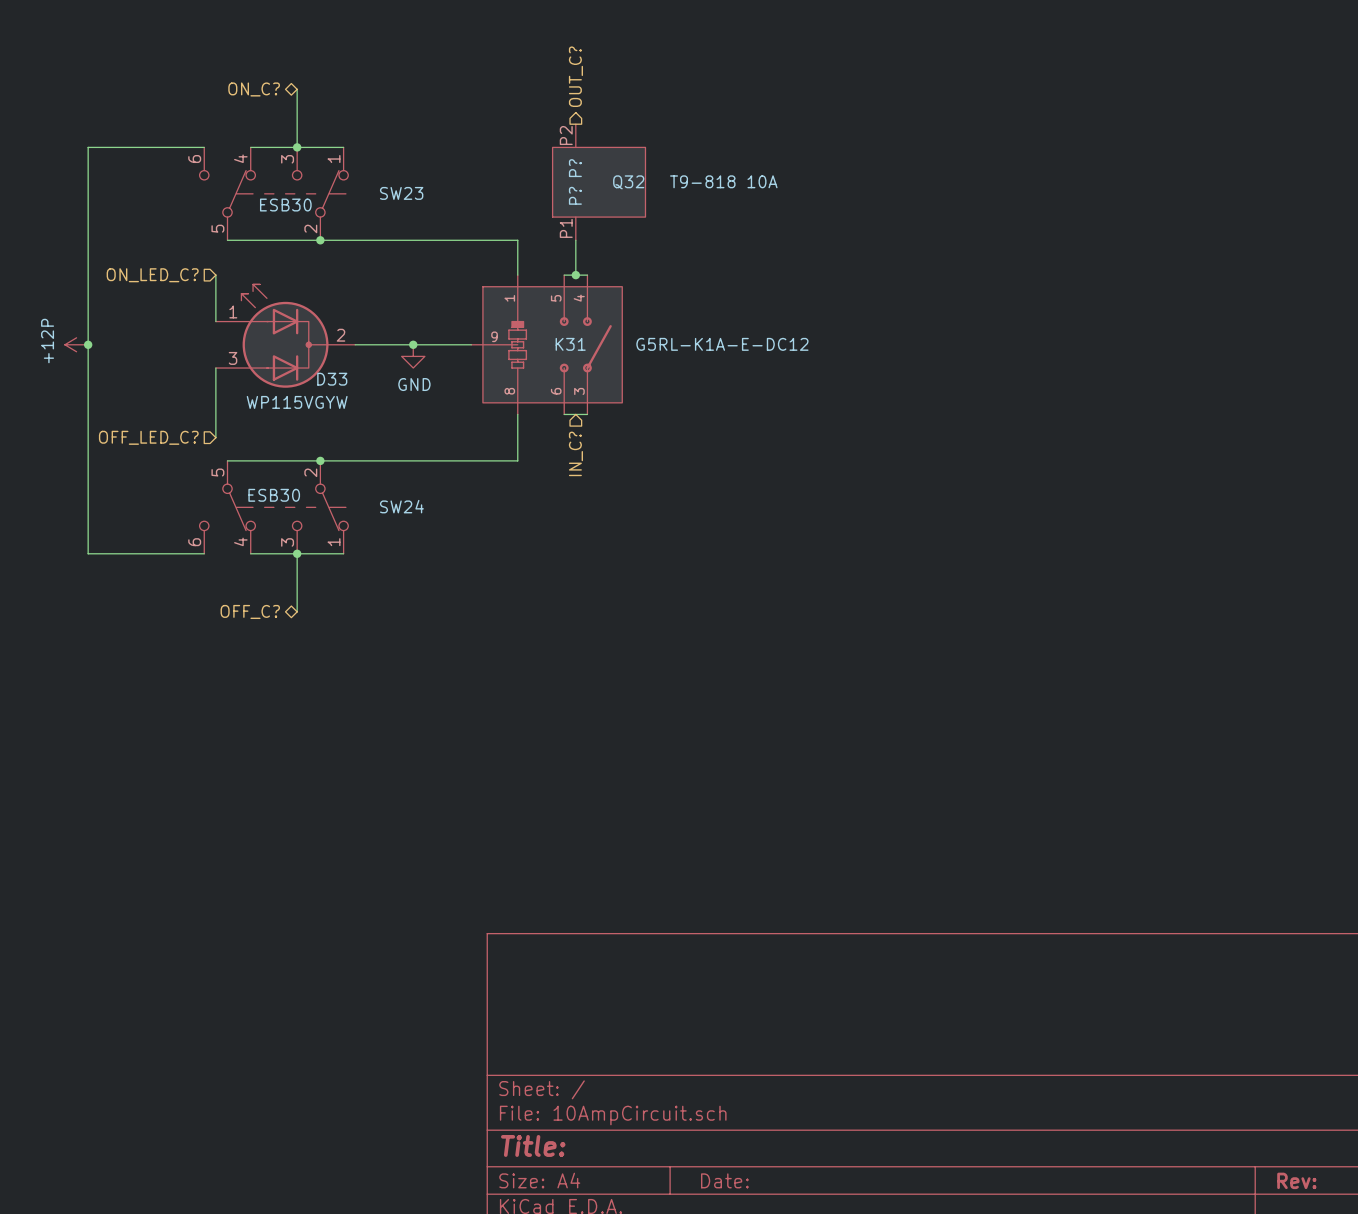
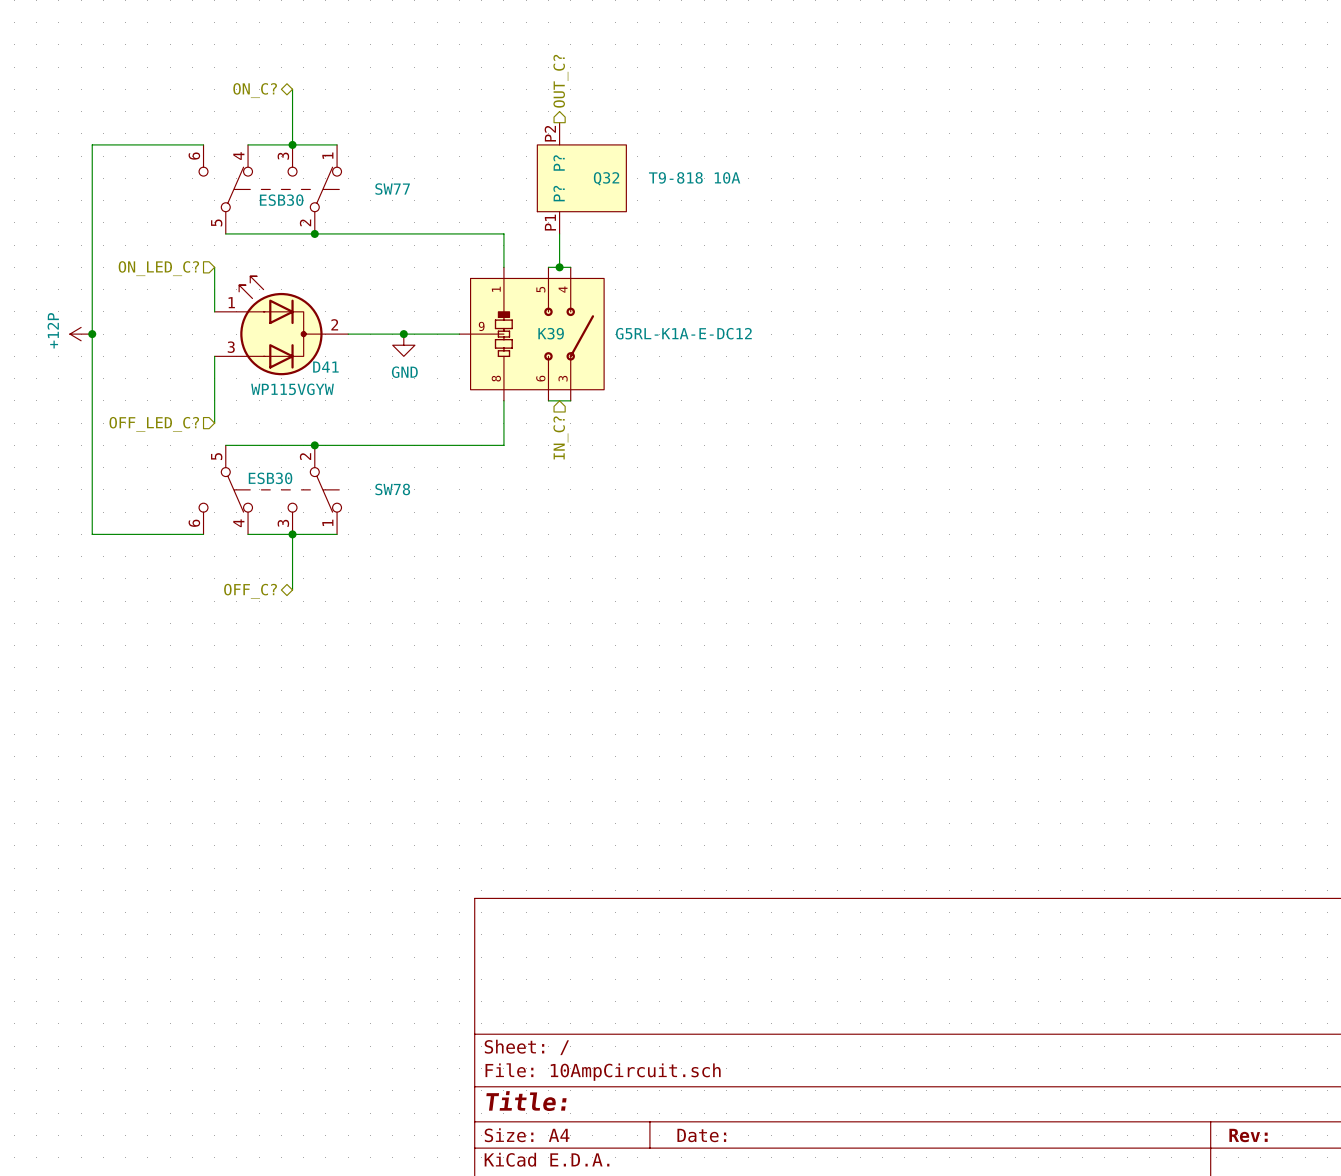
SW23 name: SW23 (401, 193) -> SW77 (392, 189)
K31 name: K31 (570, 344) -> K39 (551, 333)
D33 name: D33 (332, 379) -> D41 (325, 367)
SW24 name: SW24 (401, 506) -> SW78 (392, 489)

